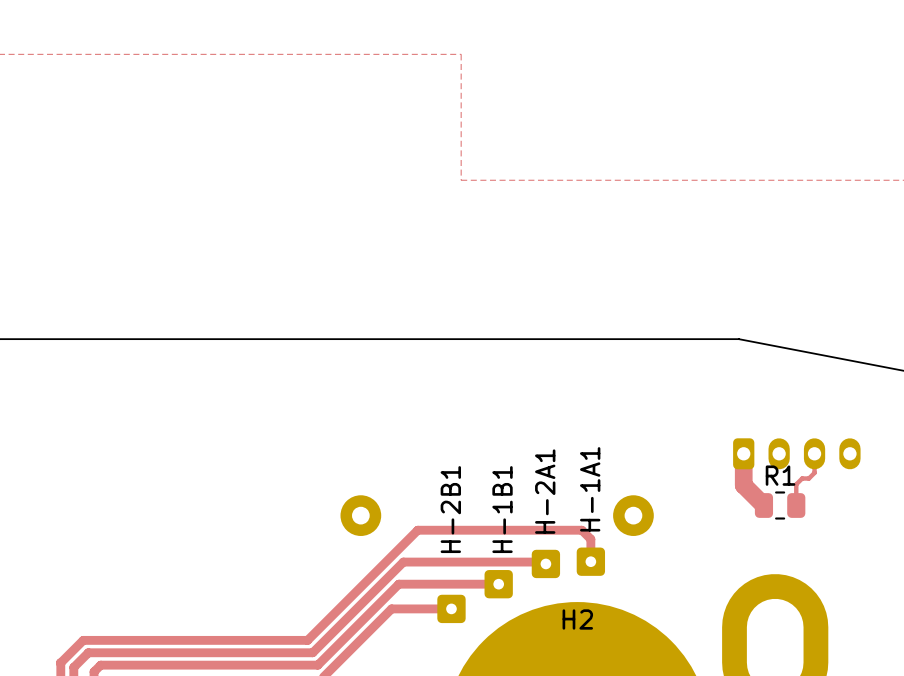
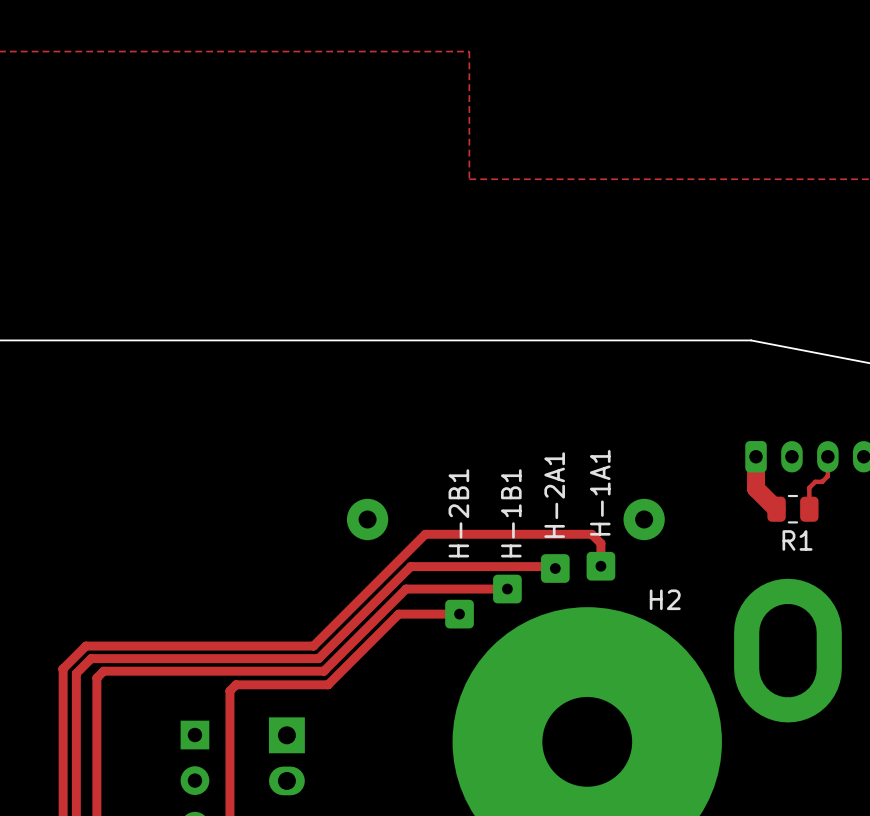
R1 name position: R1 (780, 475) -> R1 (797, 540)
H2 name position: H2 (577, 619) -> H2 (665, 599)

